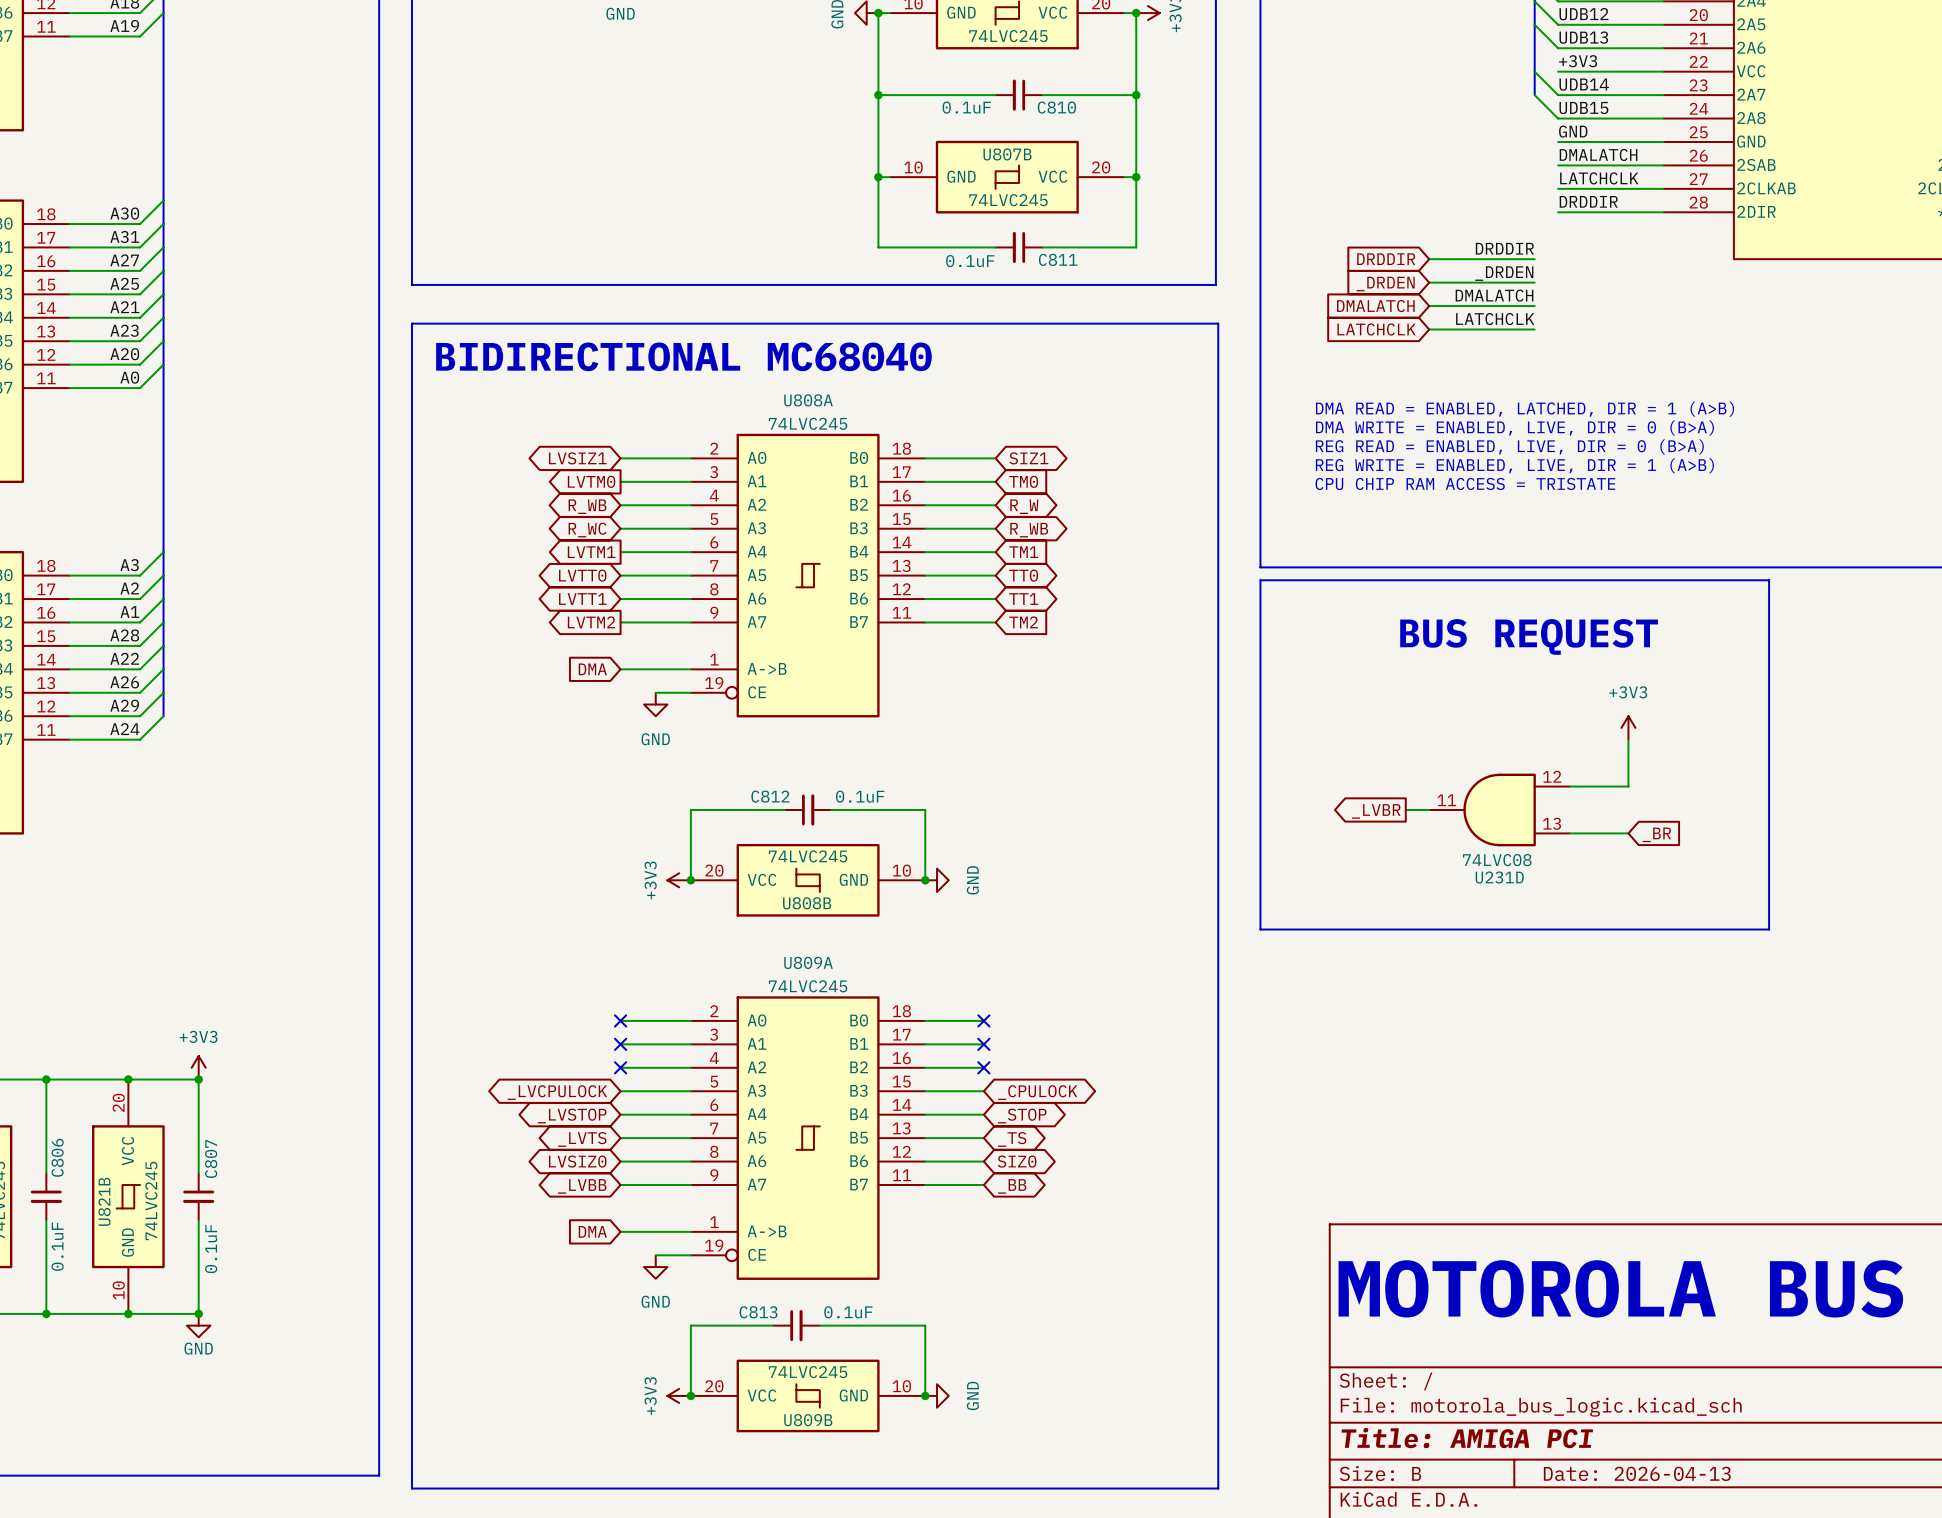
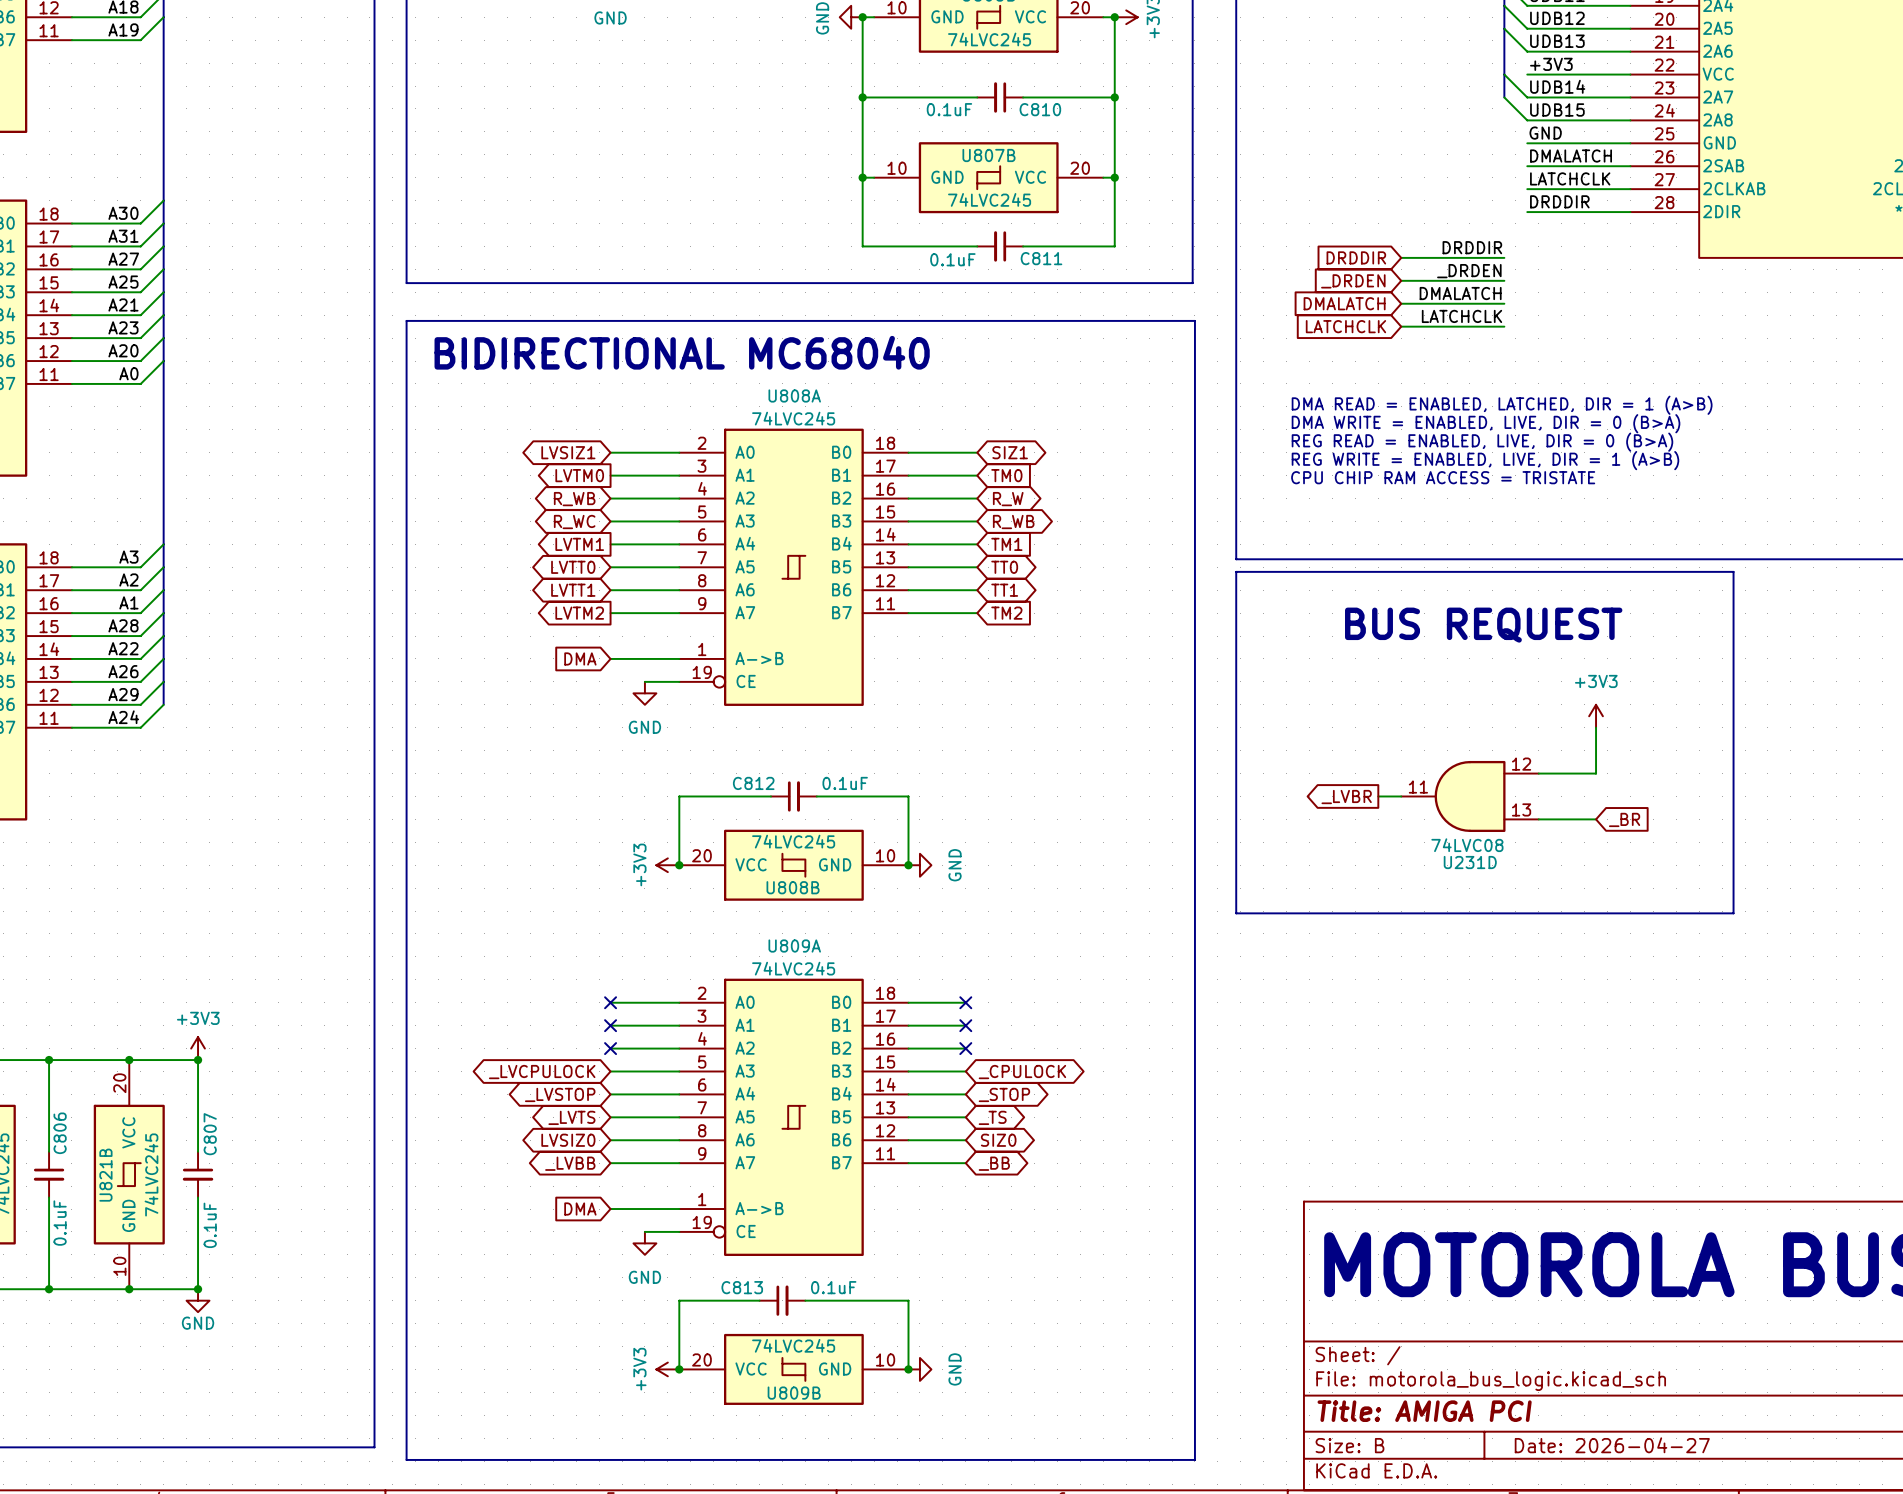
title block: Date: 2026-04-13 (1637, 1473) -> Date: 2026-04-27 (1612, 1445)

